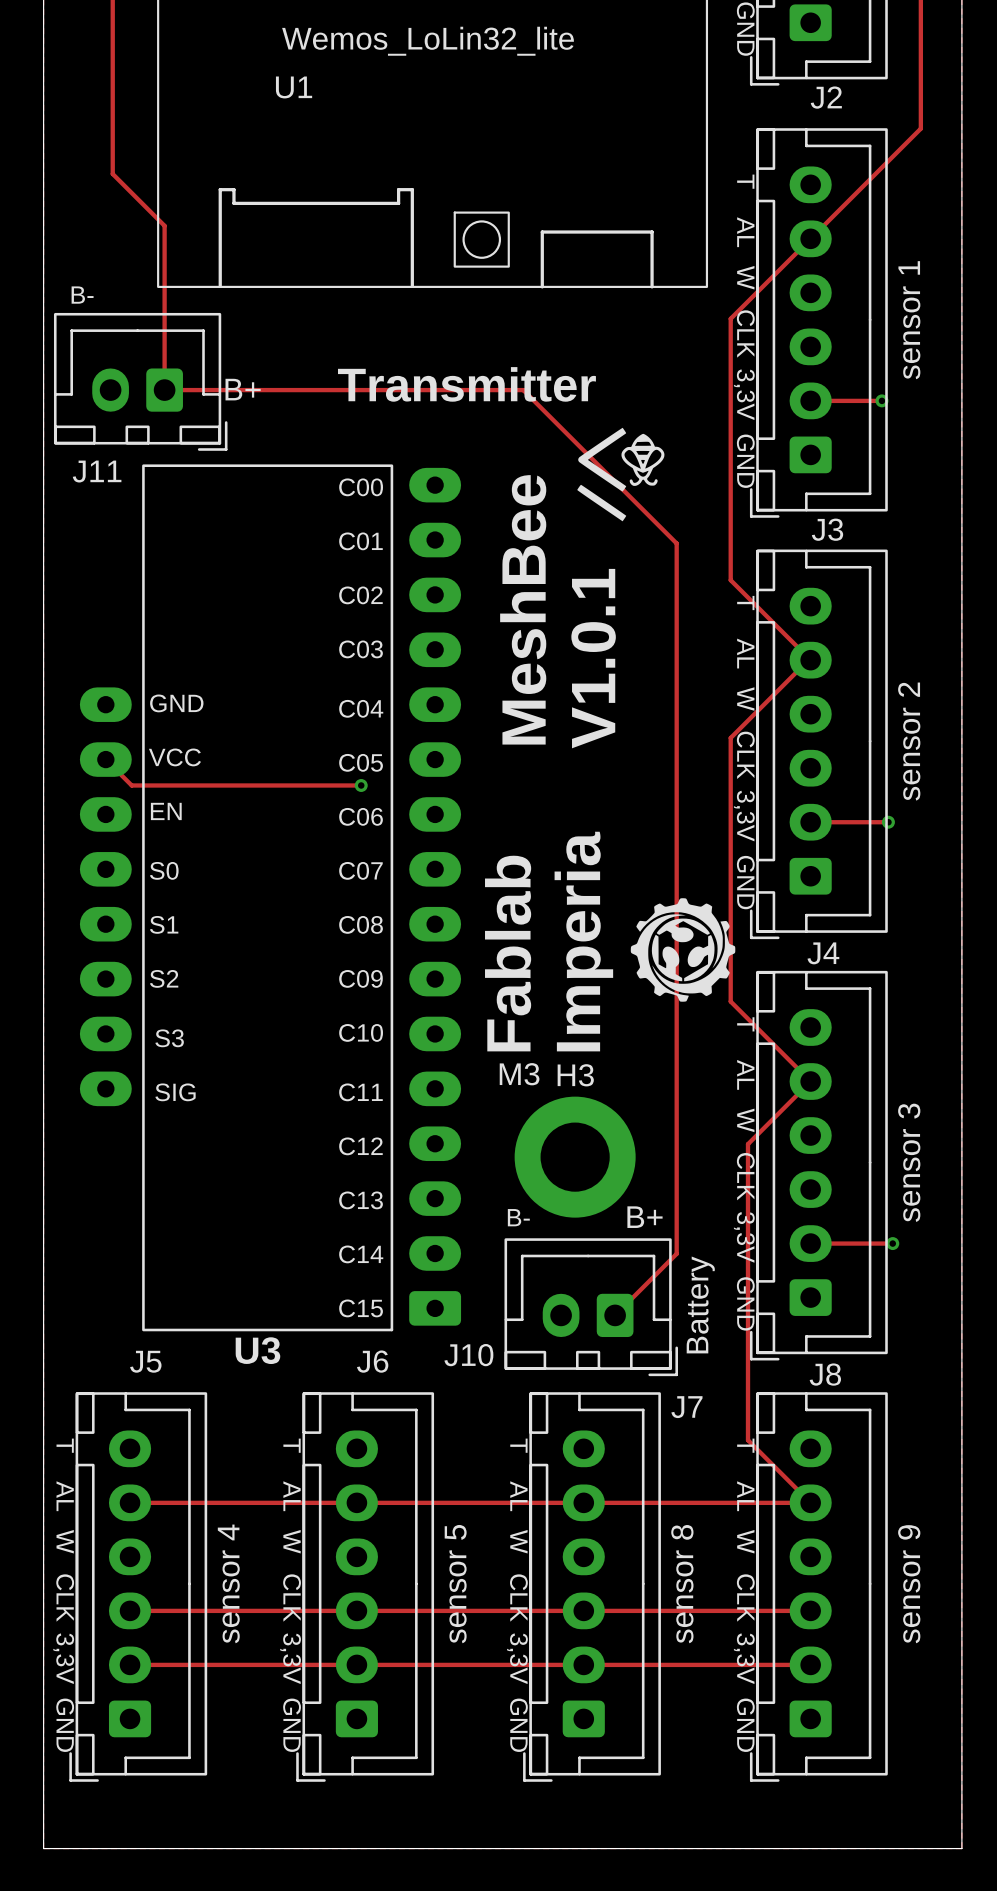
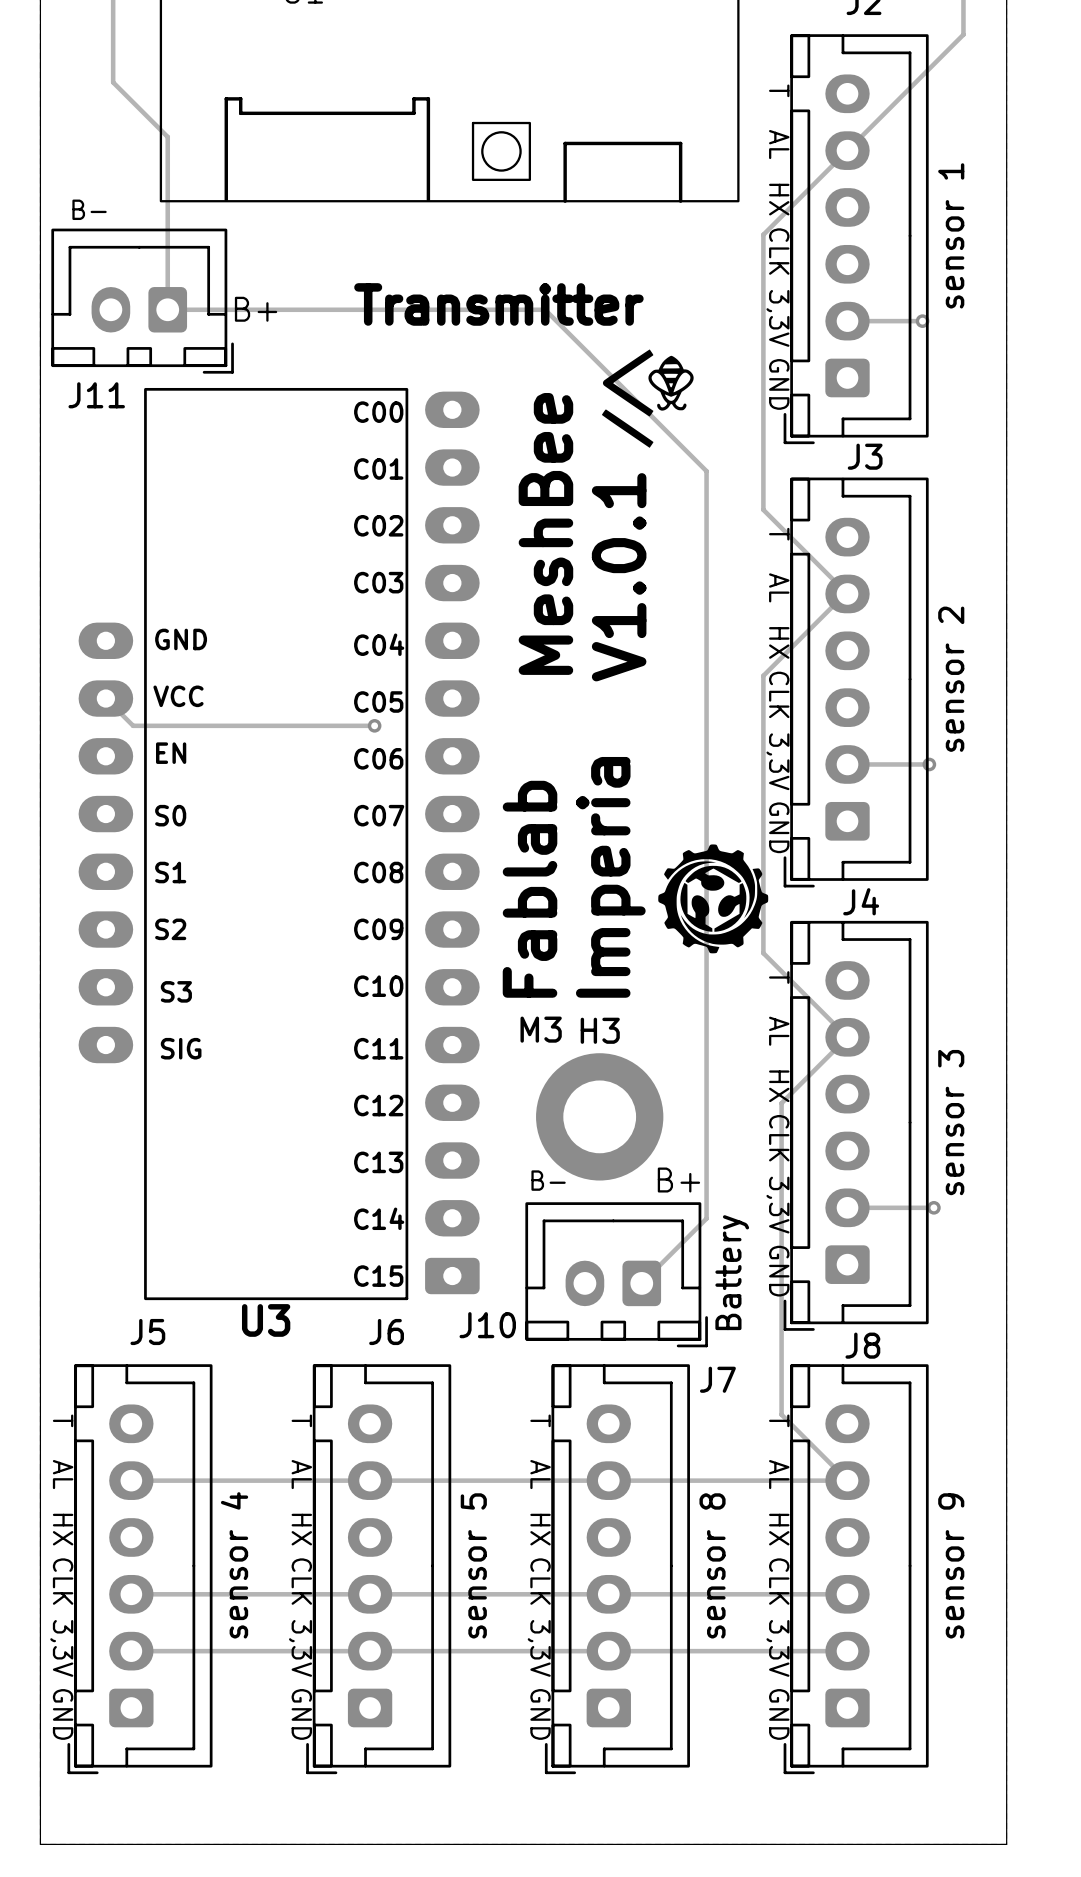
J2 text: W (745, 277) -> HX (779, 199)
J3 text: W (745, 699) -> HX (779, 642)
J4 text: W (745, 1120) -> HX (779, 1086)
J5 text: W (65, 1541) -> HX (63, 1529)
J6 text: W (292, 1541) -> HX (301, 1529)
J7 text: W (518, 1541) -> HX (540, 1529)
J8 text: W (745, 1541) -> HX (779, 1529)

